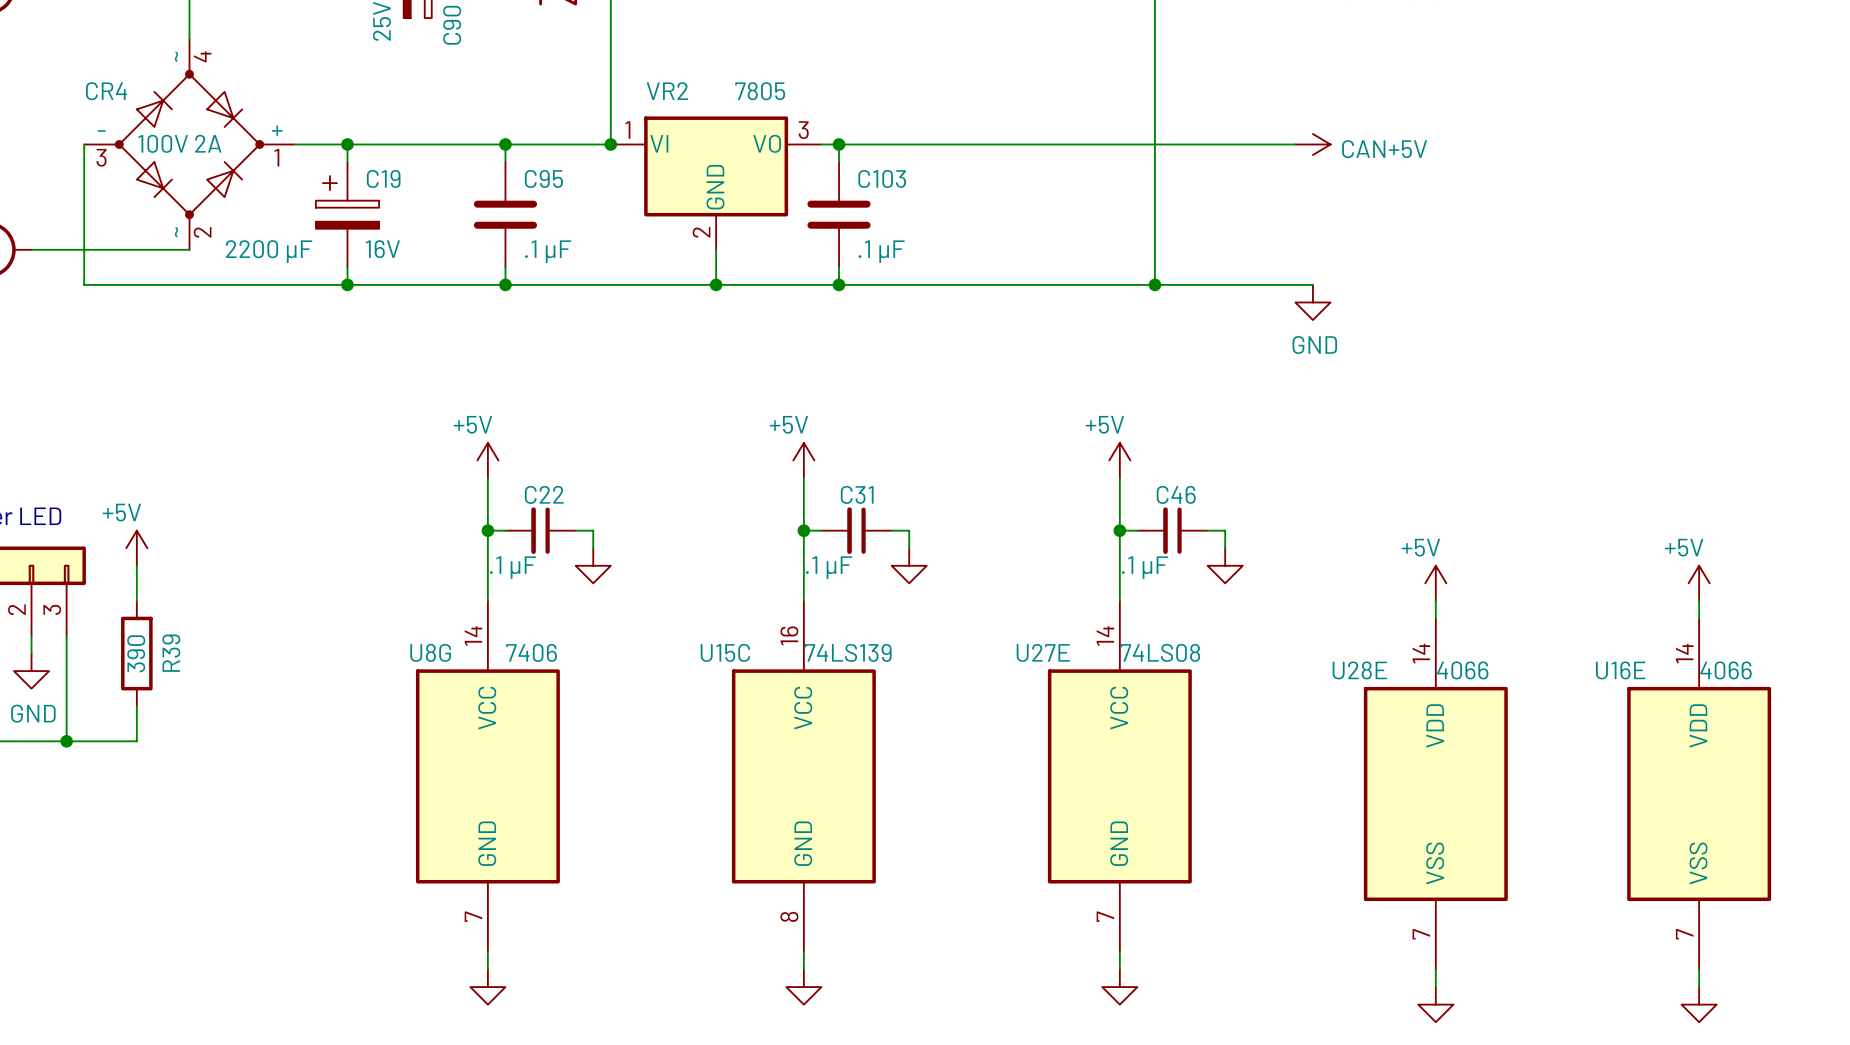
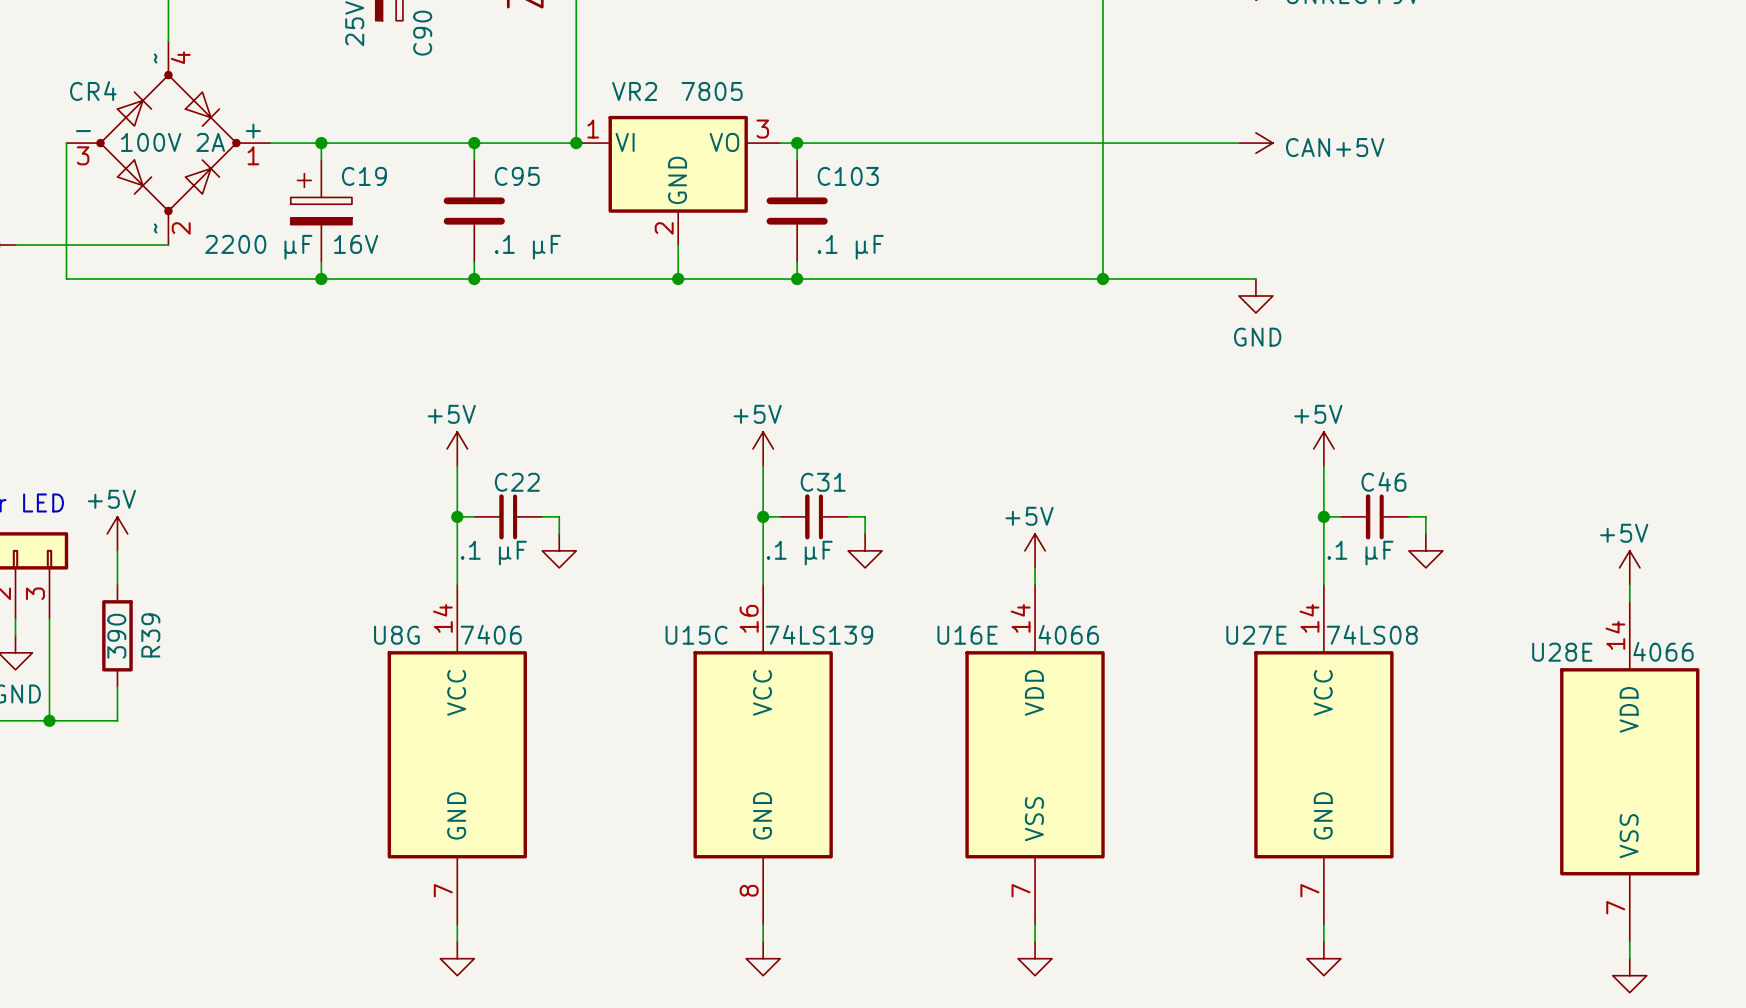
power symbol position: +5V (1119, 460) -> +5V (1035, 550)
power symbol: none -> +5V (1323, 448)
wire: (1119, 478) (1119, 600) -> (1323, 465) (1323, 584)
wire: (1119, 530) (1137, 530) -> (1323, 516) (1340, 516)
junction: (1119, 530) -> none
C46 position: (1172, 530) -> (1374, 516)
wire: (1207, 530) (1225, 530) (1225, 548) -> (1408, 516) (1425, 516) (1425, 533)
junction: none -> (1323, 516)
power symbol: (1225, 565) -> none
power symbol: none -> (1425, 550)
wire: none -> (1035, 567) (1035, 584)
power symbol: +5V (1435, 583) -> none
wire: (1435, 600) (1435, 618) -> none
U16E name: U16E (1620, 670) -> U28E (1562, 652)
U16E: none -> 4066 (1035, 754)
U27E position: (1119, 776) -> (1323, 754)
U28E: 4066 (1435, 793) -> none
wire: none -> (1035, 924) (1035, 941)
wire: (1119, 951) (1119, 969) -> (1323, 924) (1323, 941)
wire: (1435, 969) (1435, 987) -> none
power symbol position: (1119, 987) -> (1035, 958)
power symbol position: (1435, 1004) -> (1323, 958)

